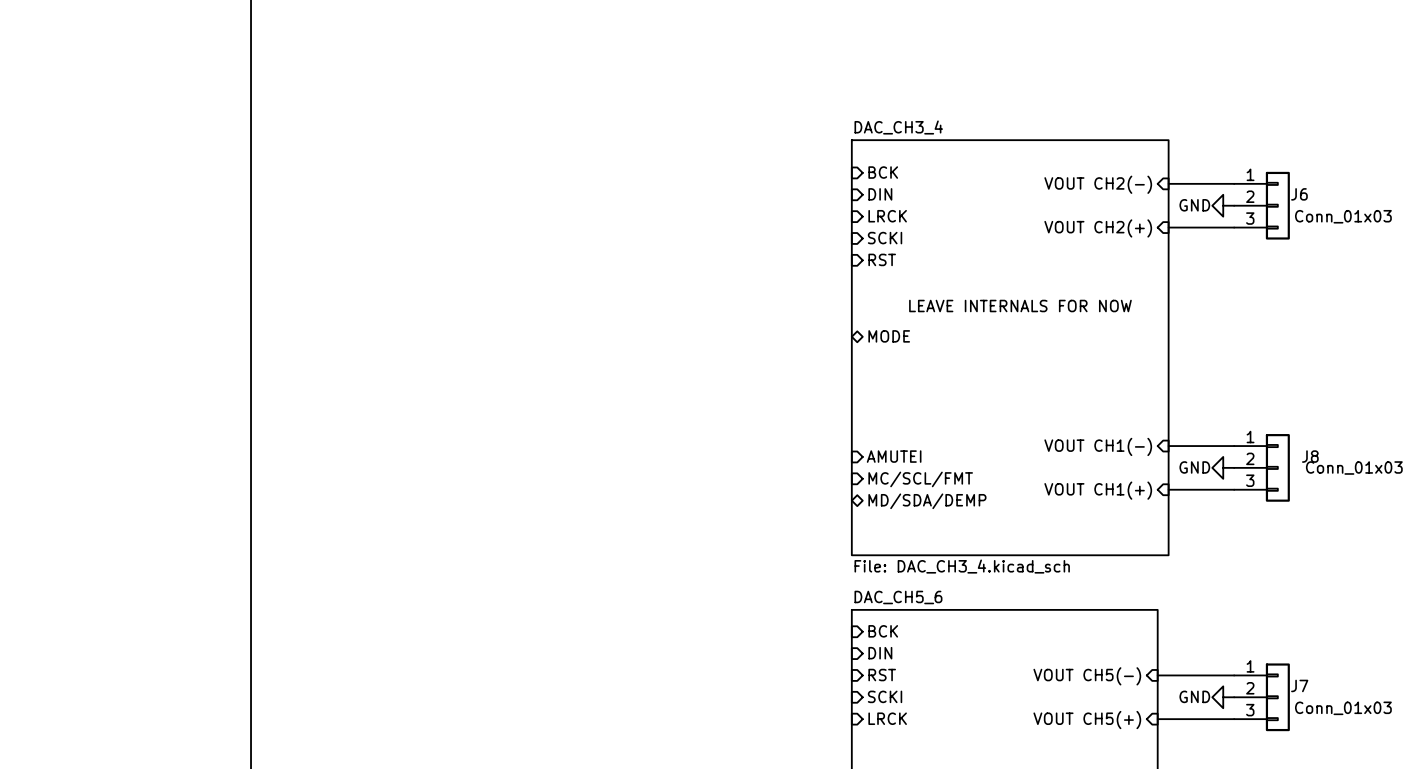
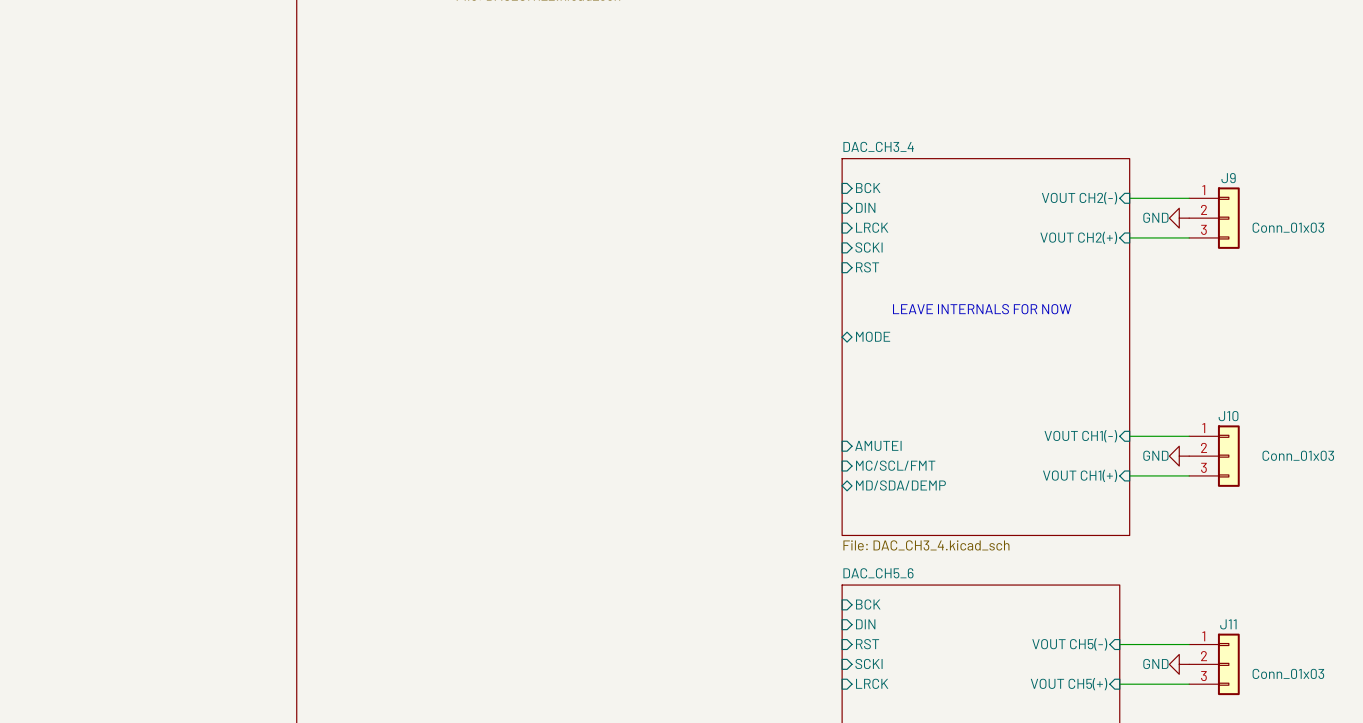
J6 name: J6 (1299, 194) -> J9 (1228, 178)
J8 name: J8 (1310, 456) -> J10 (1228, 416)
J7 name: J7 (1299, 685) -> J11 (1228, 624)

